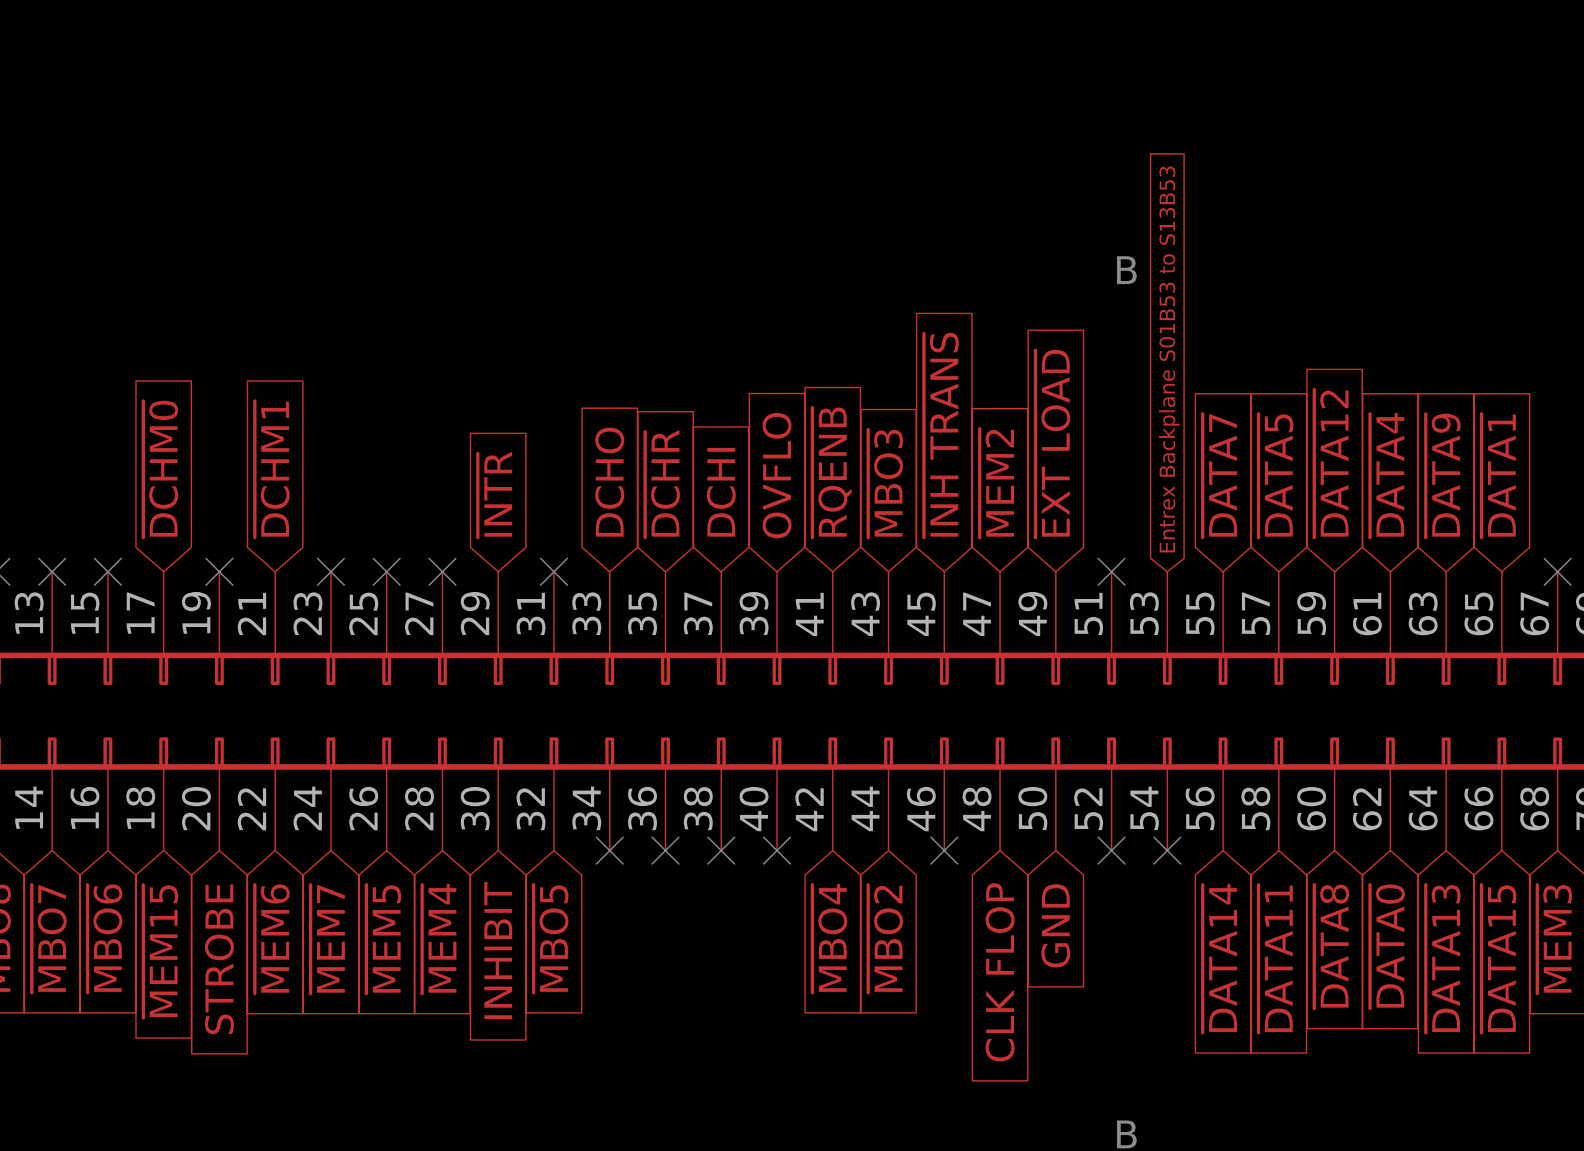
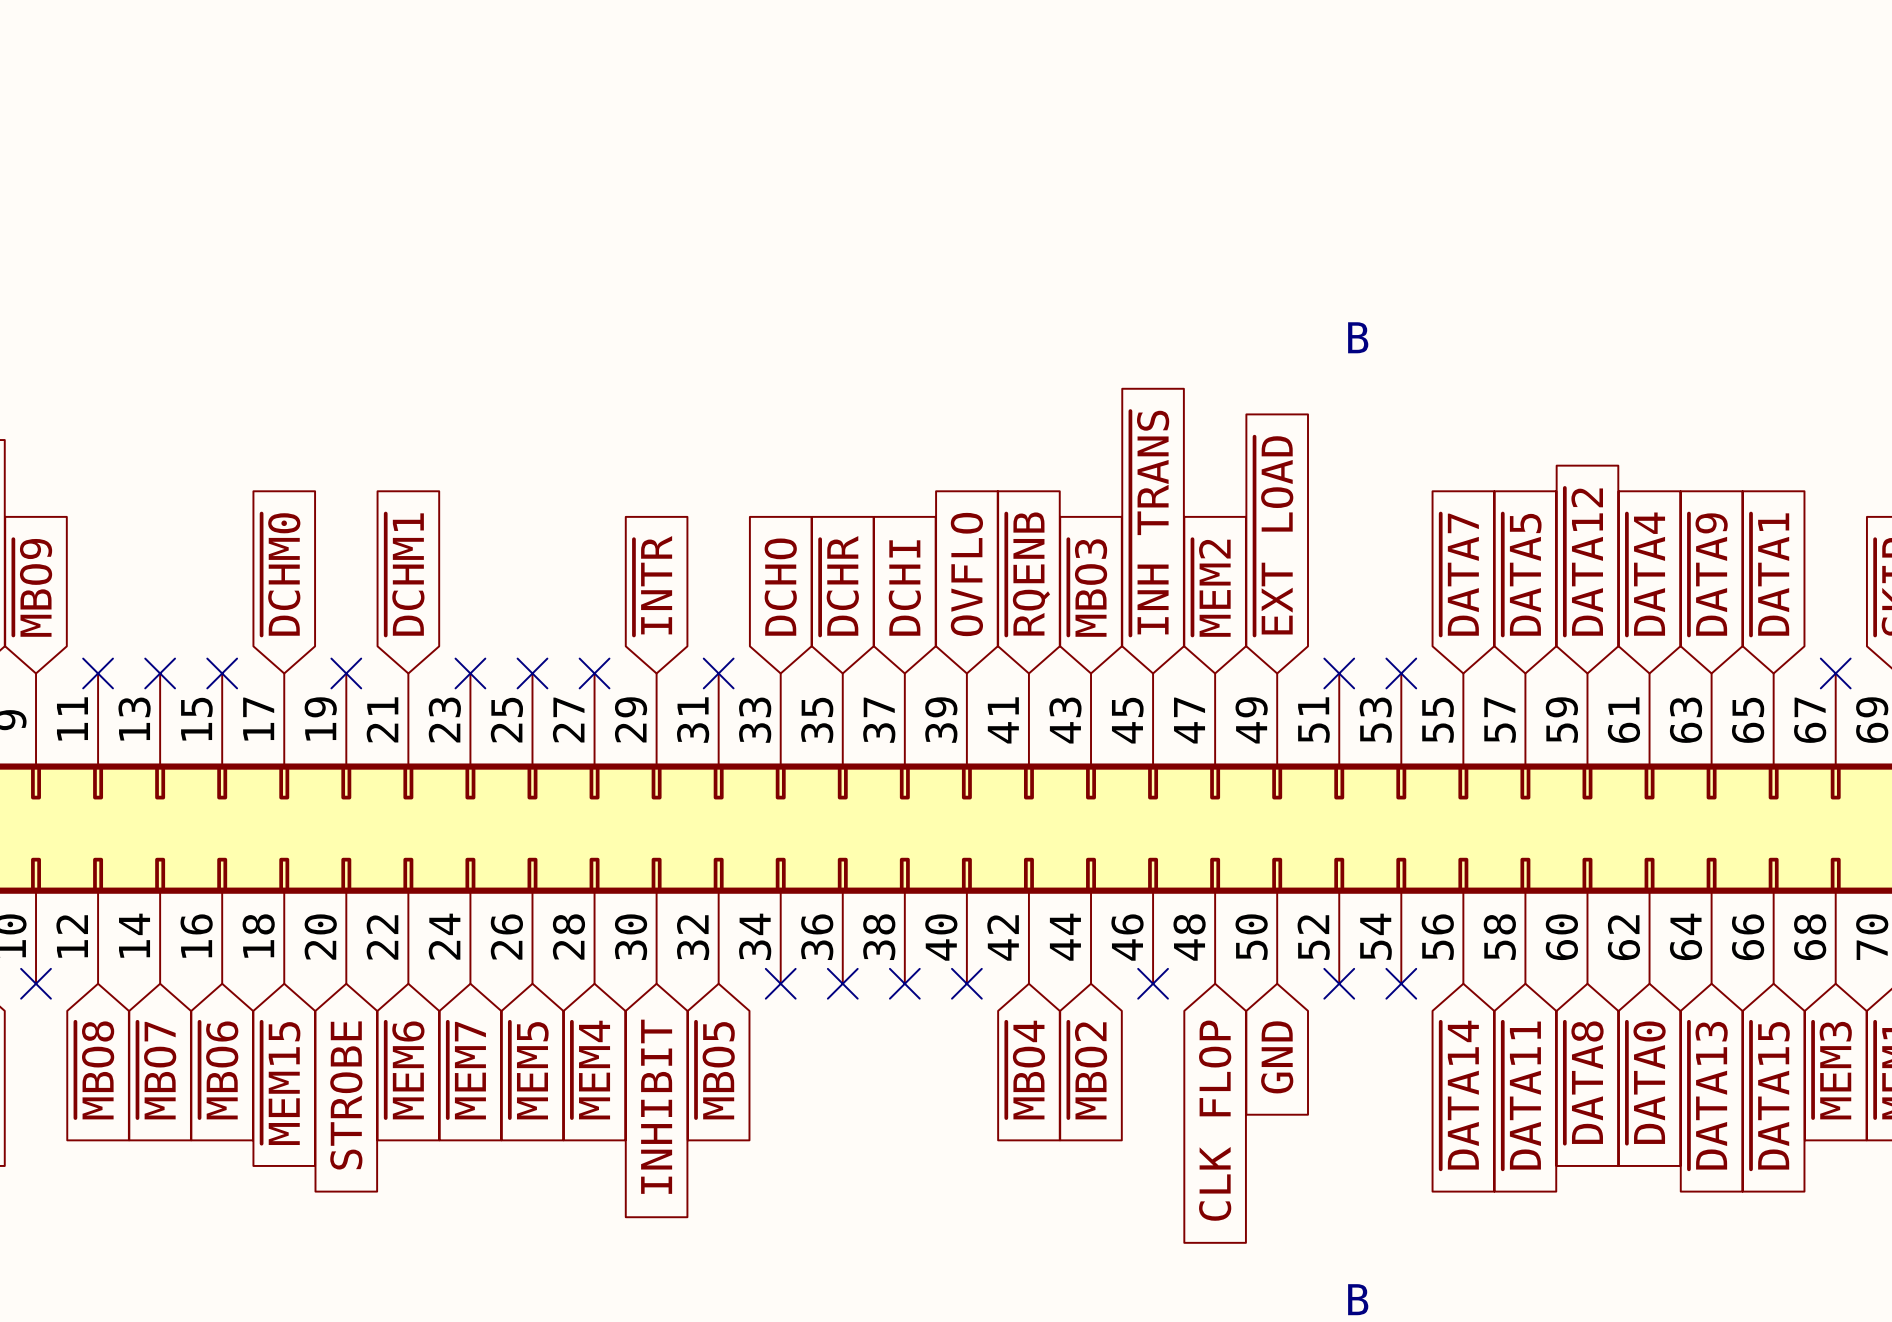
global label: Entrex Backplane S01B53 to S13B53 (1169, 359) -> none
no-connect mark: none -> (1401, 673)

